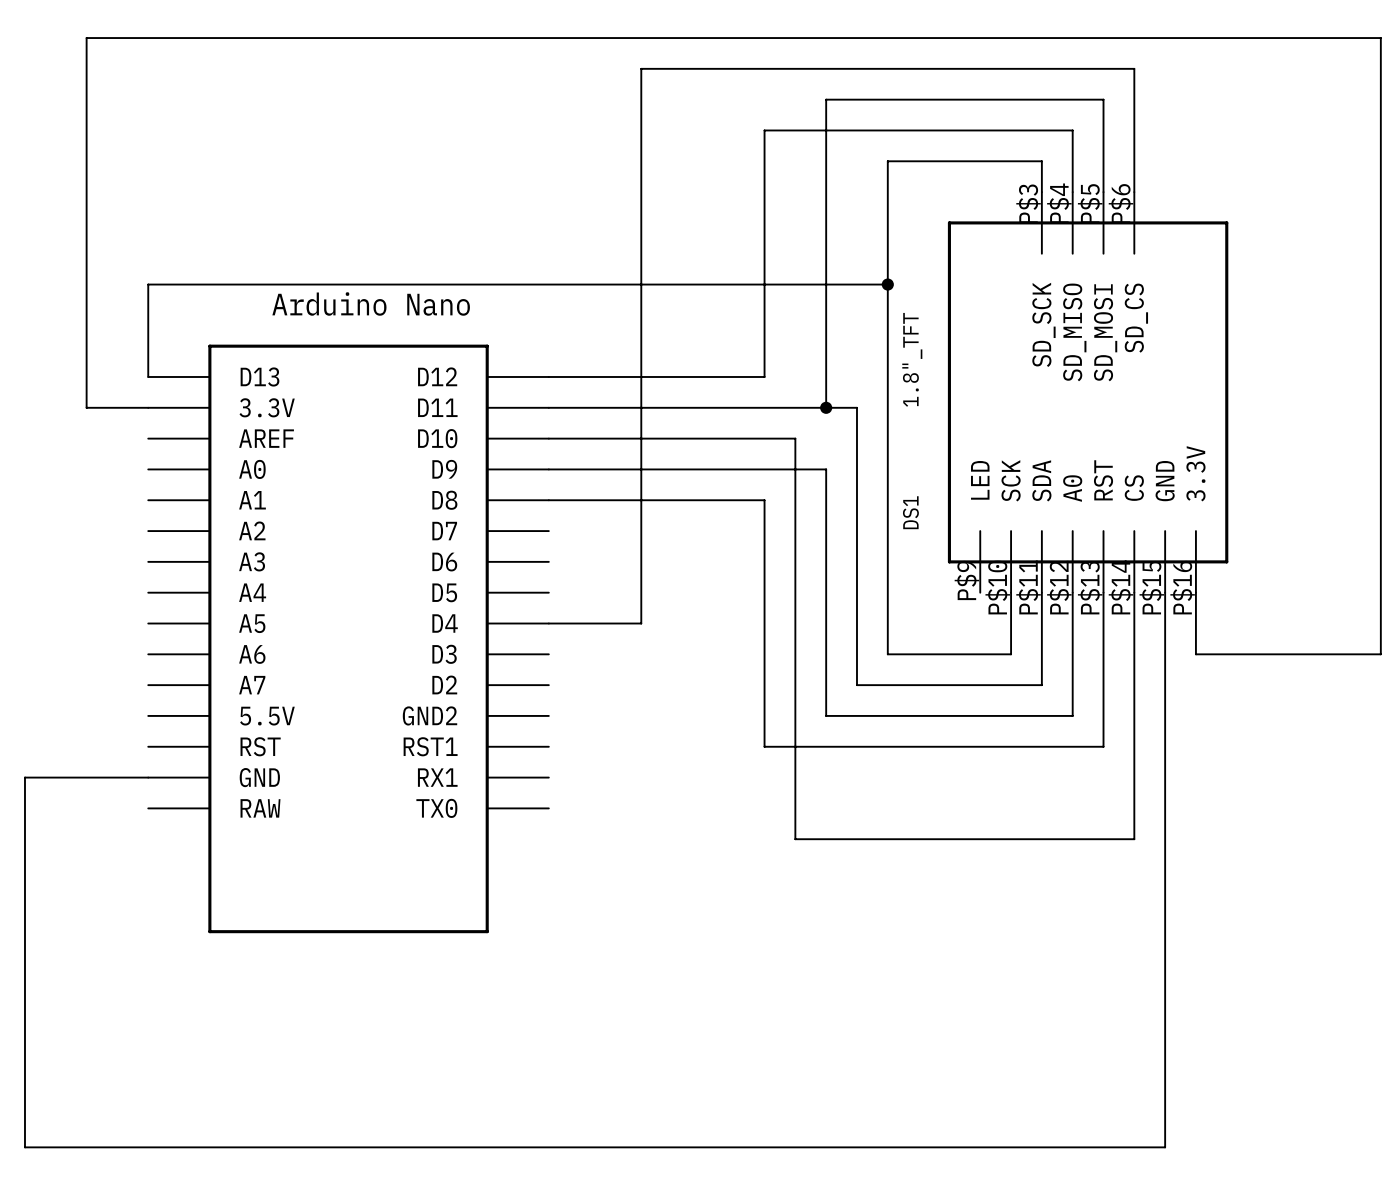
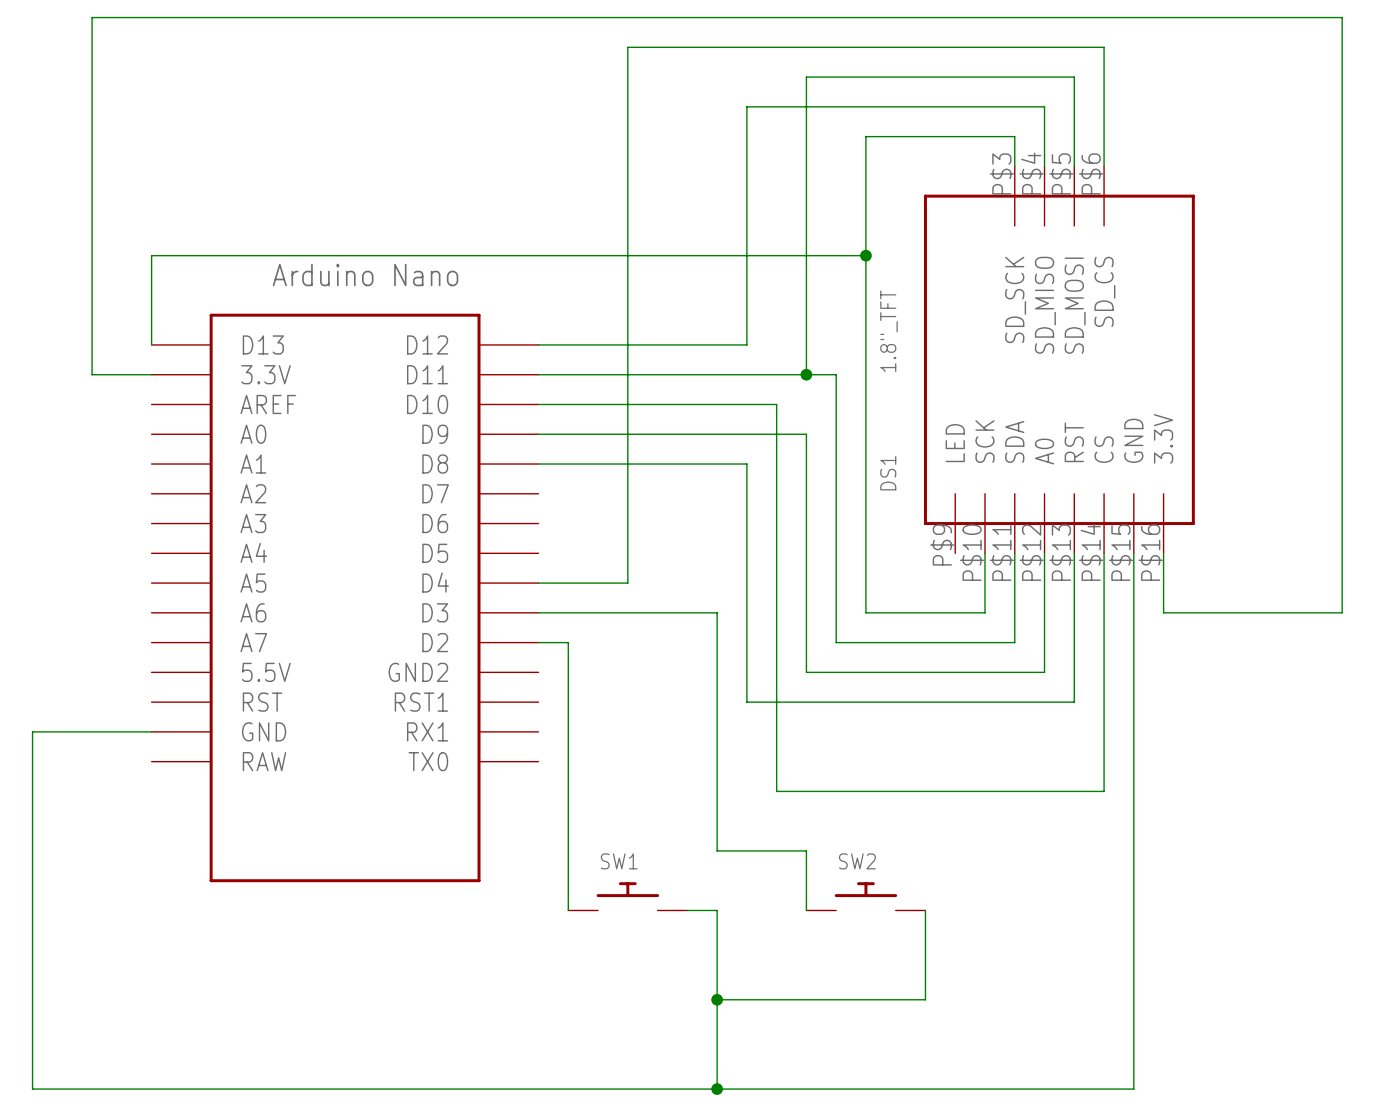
wire: none -> (538, 612) (717, 612) (717, 850) (806, 850) (806, 910)
wire: none -> (538, 642) (568, 642) (568, 910)
SW1: none -> (627, 896)
SW2: none -> (865, 896)
wire: none -> (687, 910) (717, 910) (717, 1089)
wire: none -> (925, 910) (925, 999) (717, 999)
junction: none -> (717, 999)
junction: none -> (717, 1089)

